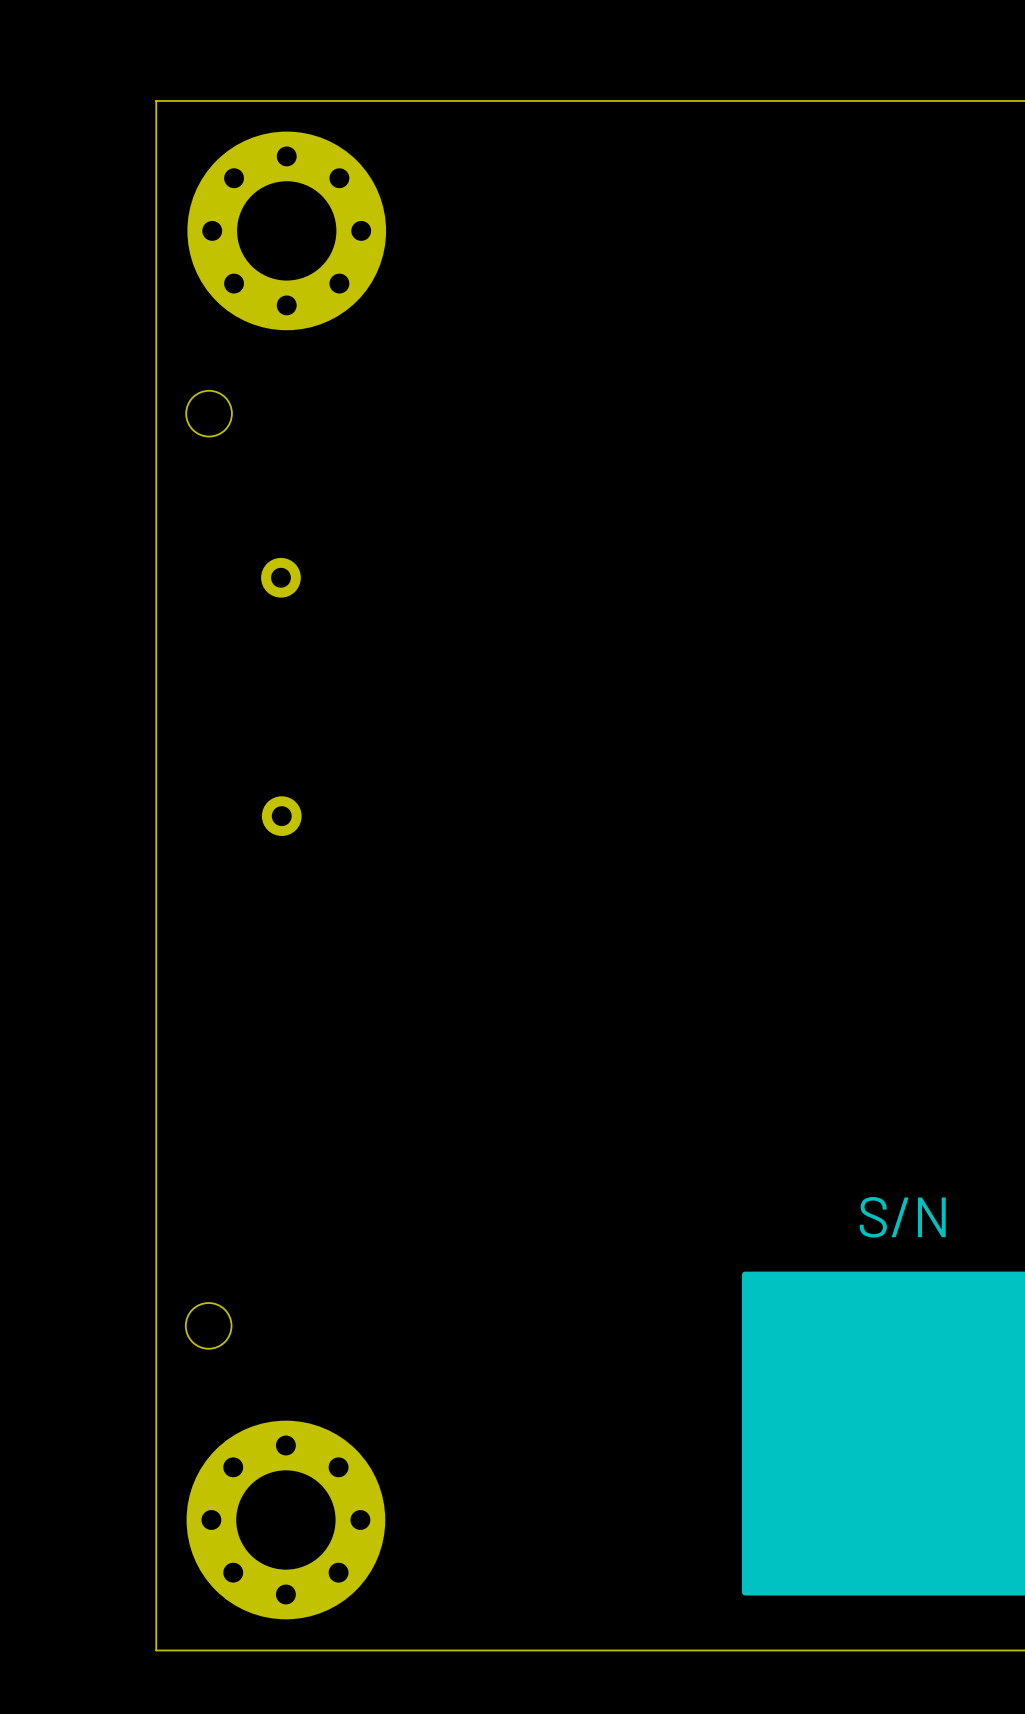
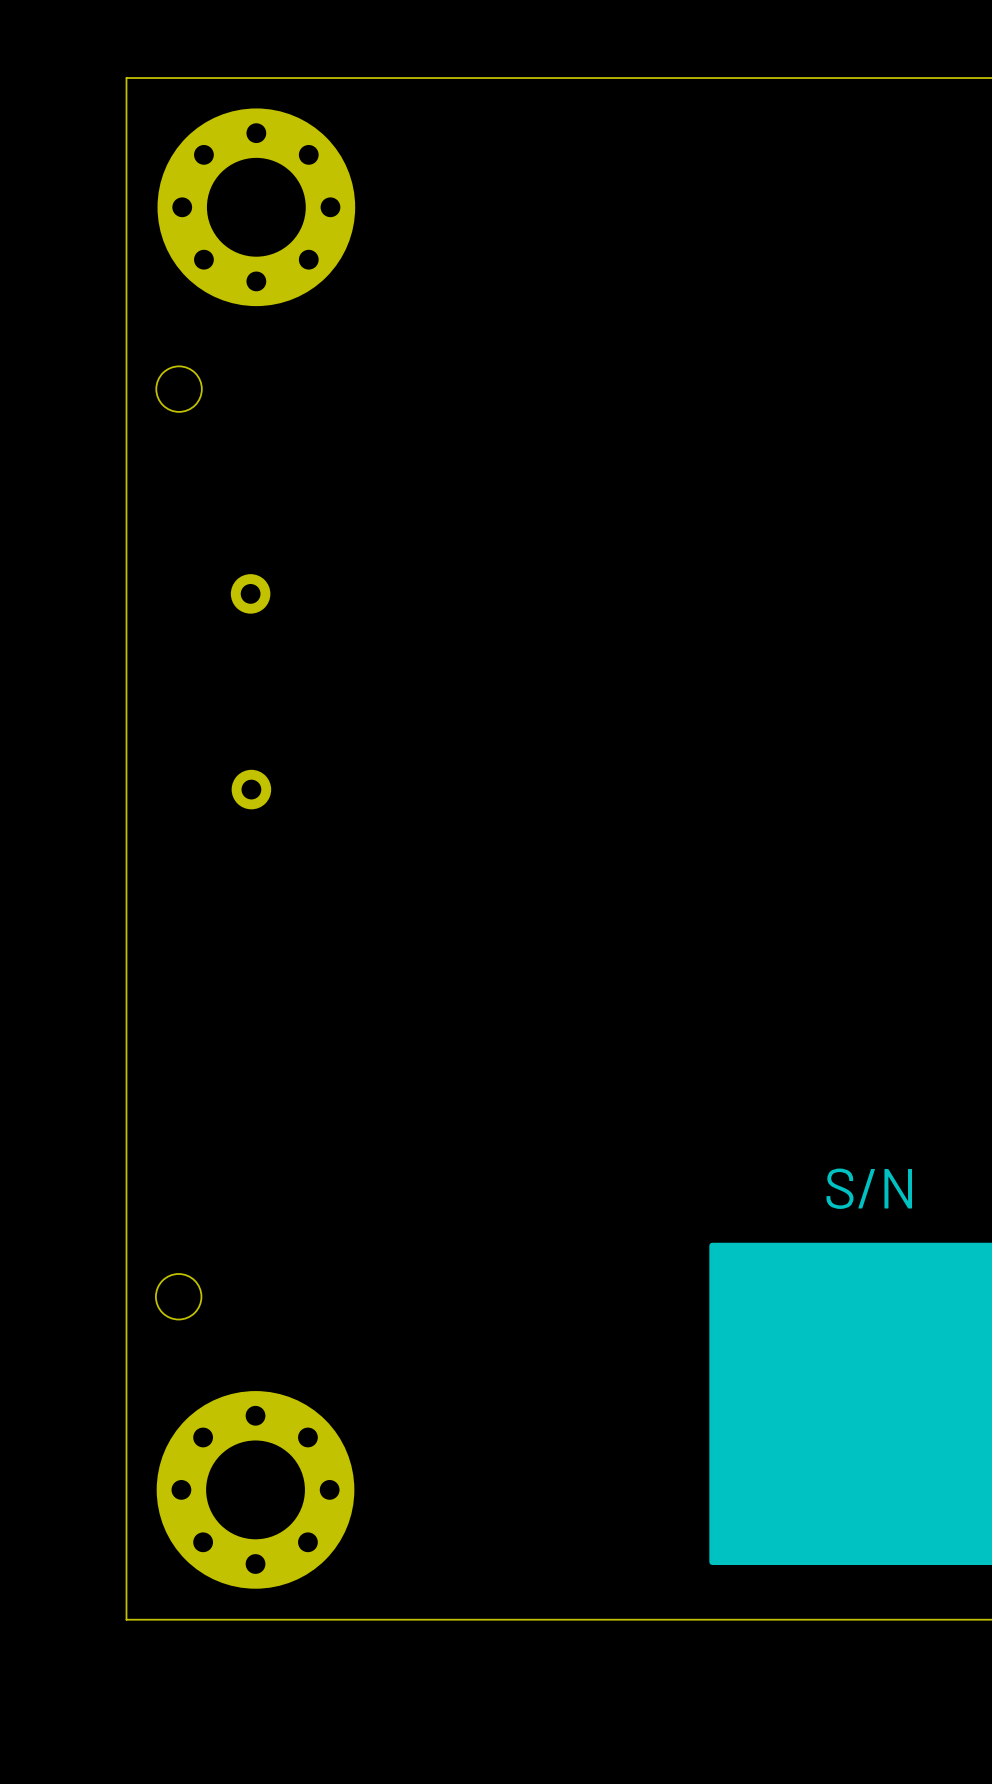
part position: (280, 577) -> (250, 593)

